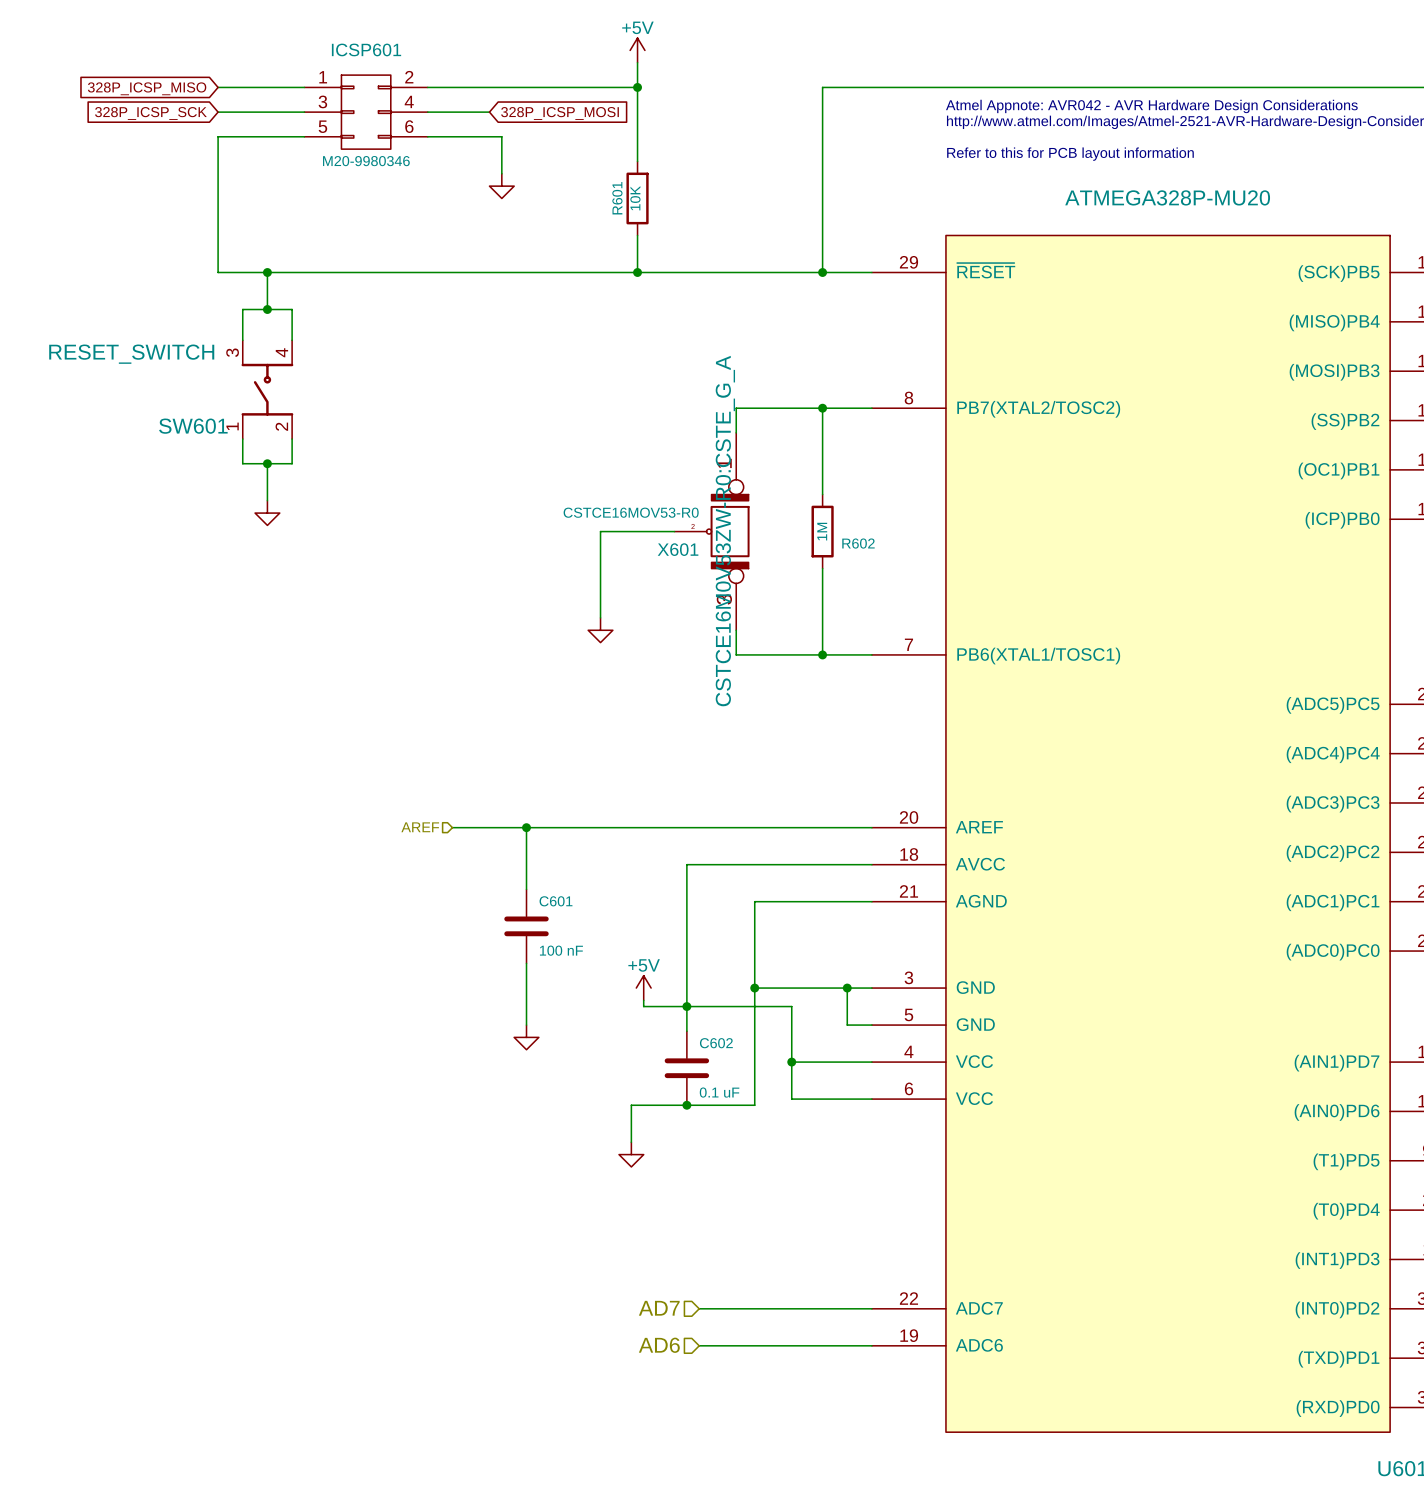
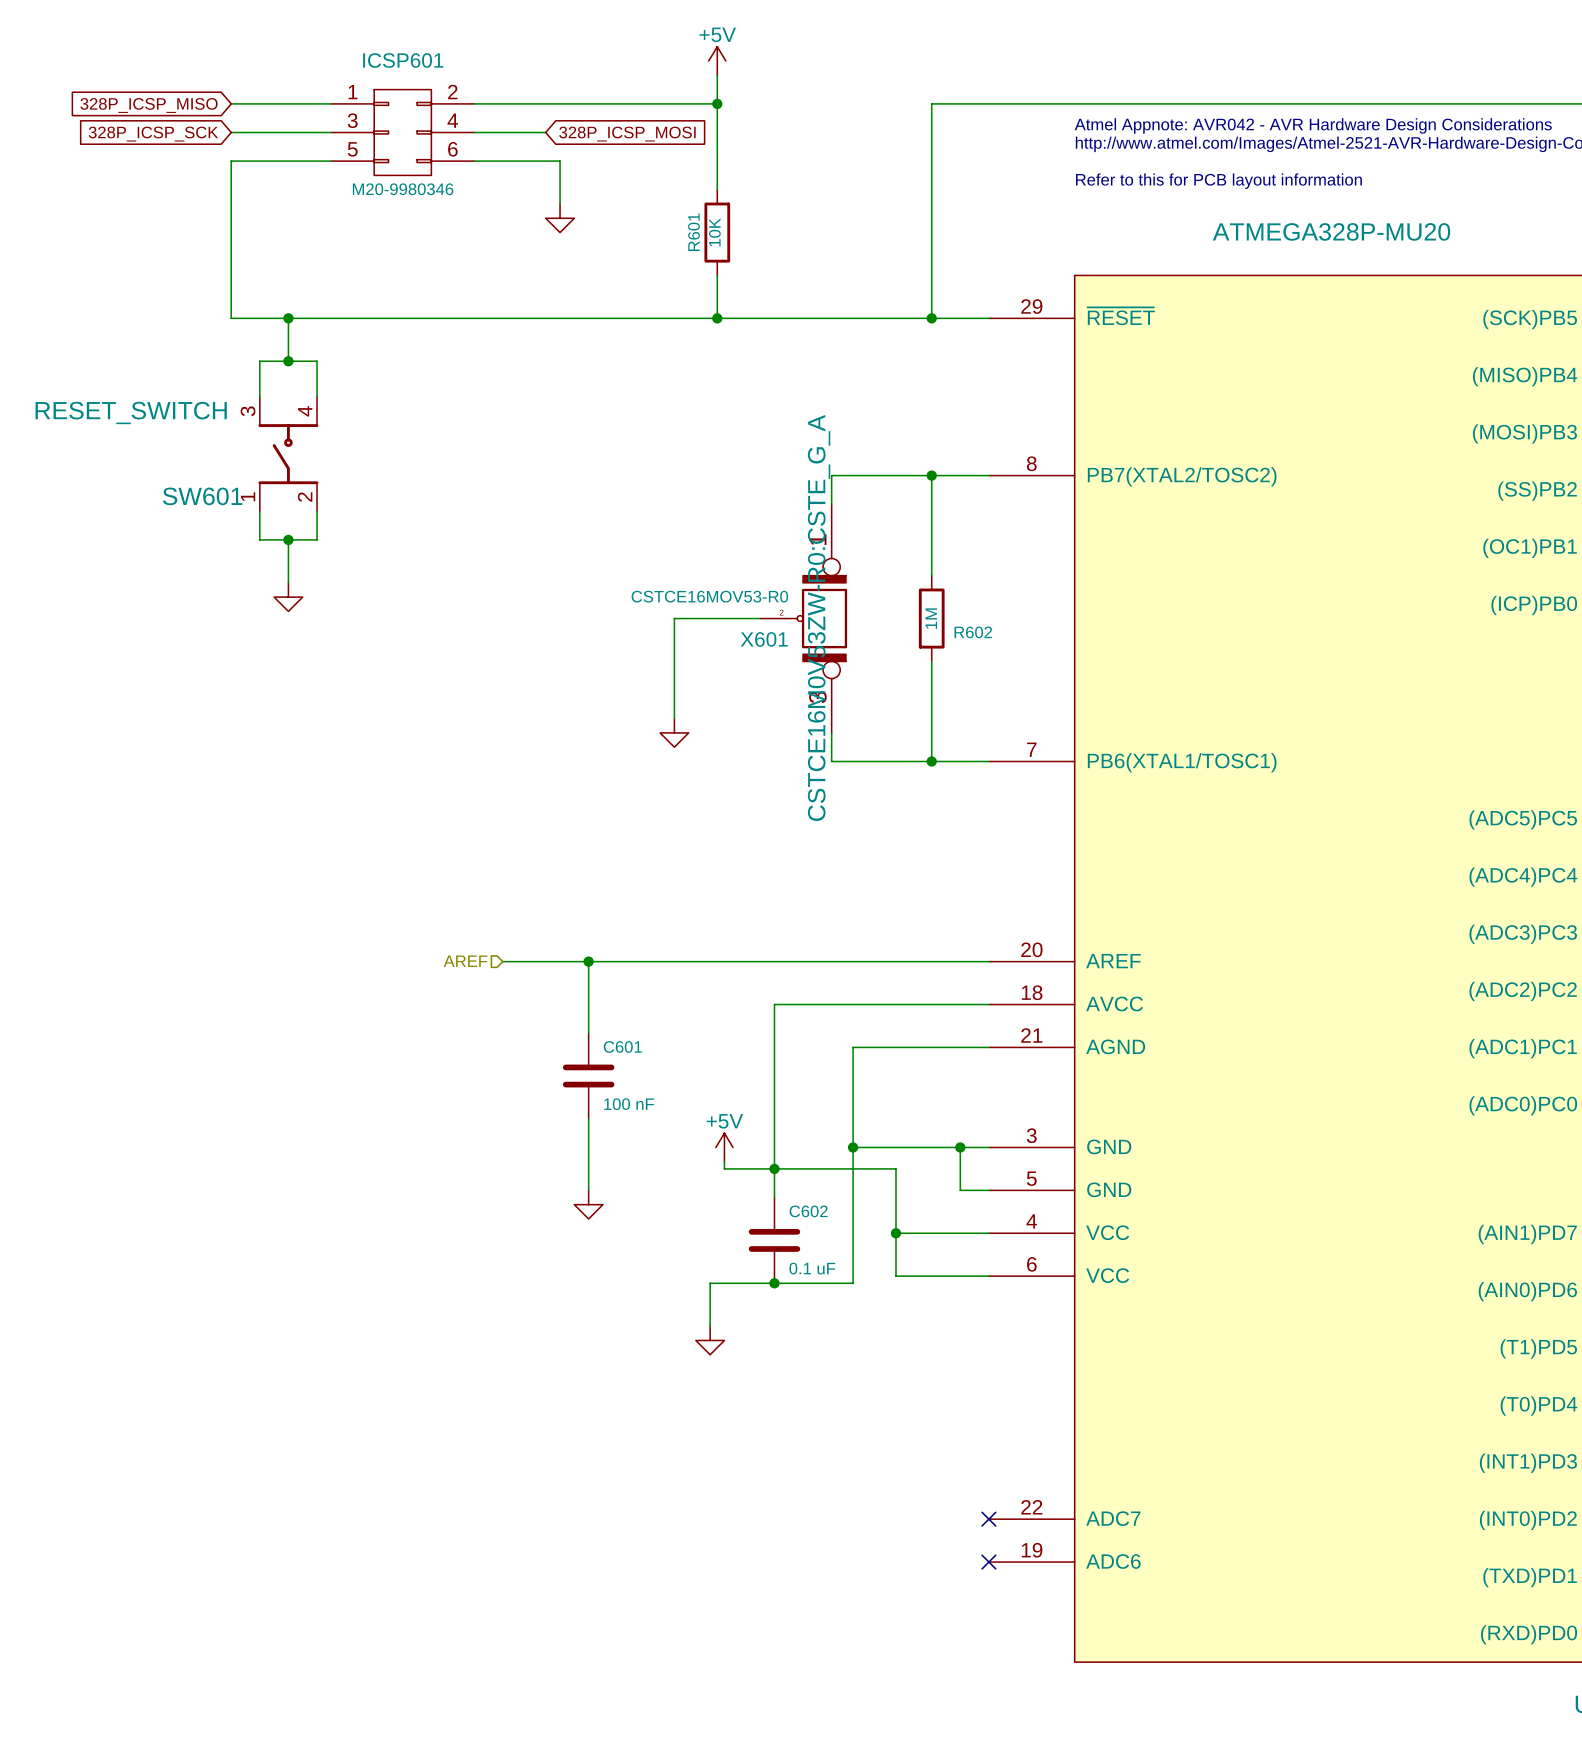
hierarchical label: AD7 (659, 1308) -> none
wire: (699, 1308) (871, 1308) -> none
no-connect mark: none -> (988, 1519)
hierarchical label: AD6 (659, 1345) -> none
wire: (699, 1345) (871, 1345) -> none
no-connect mark: none -> (988, 1562)

